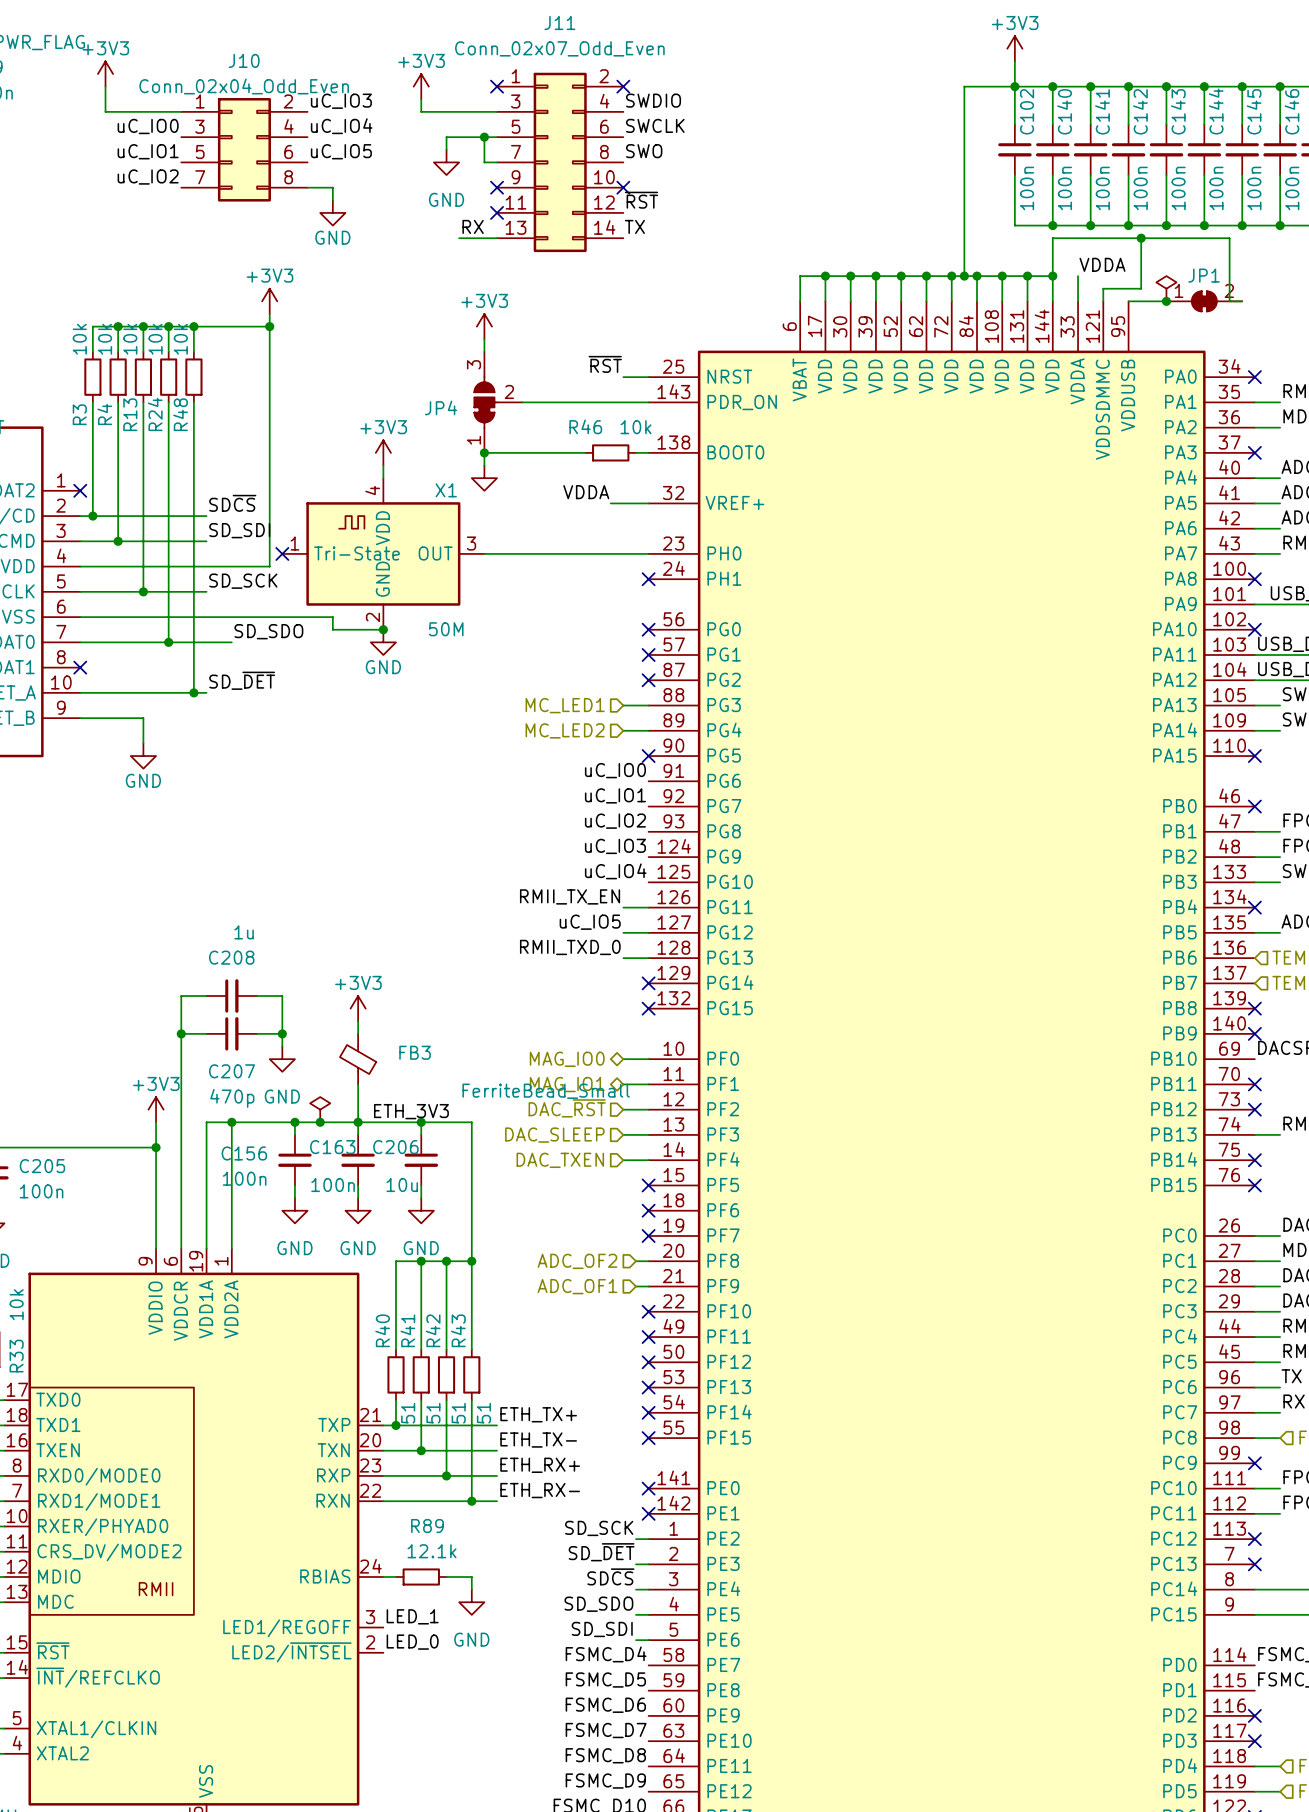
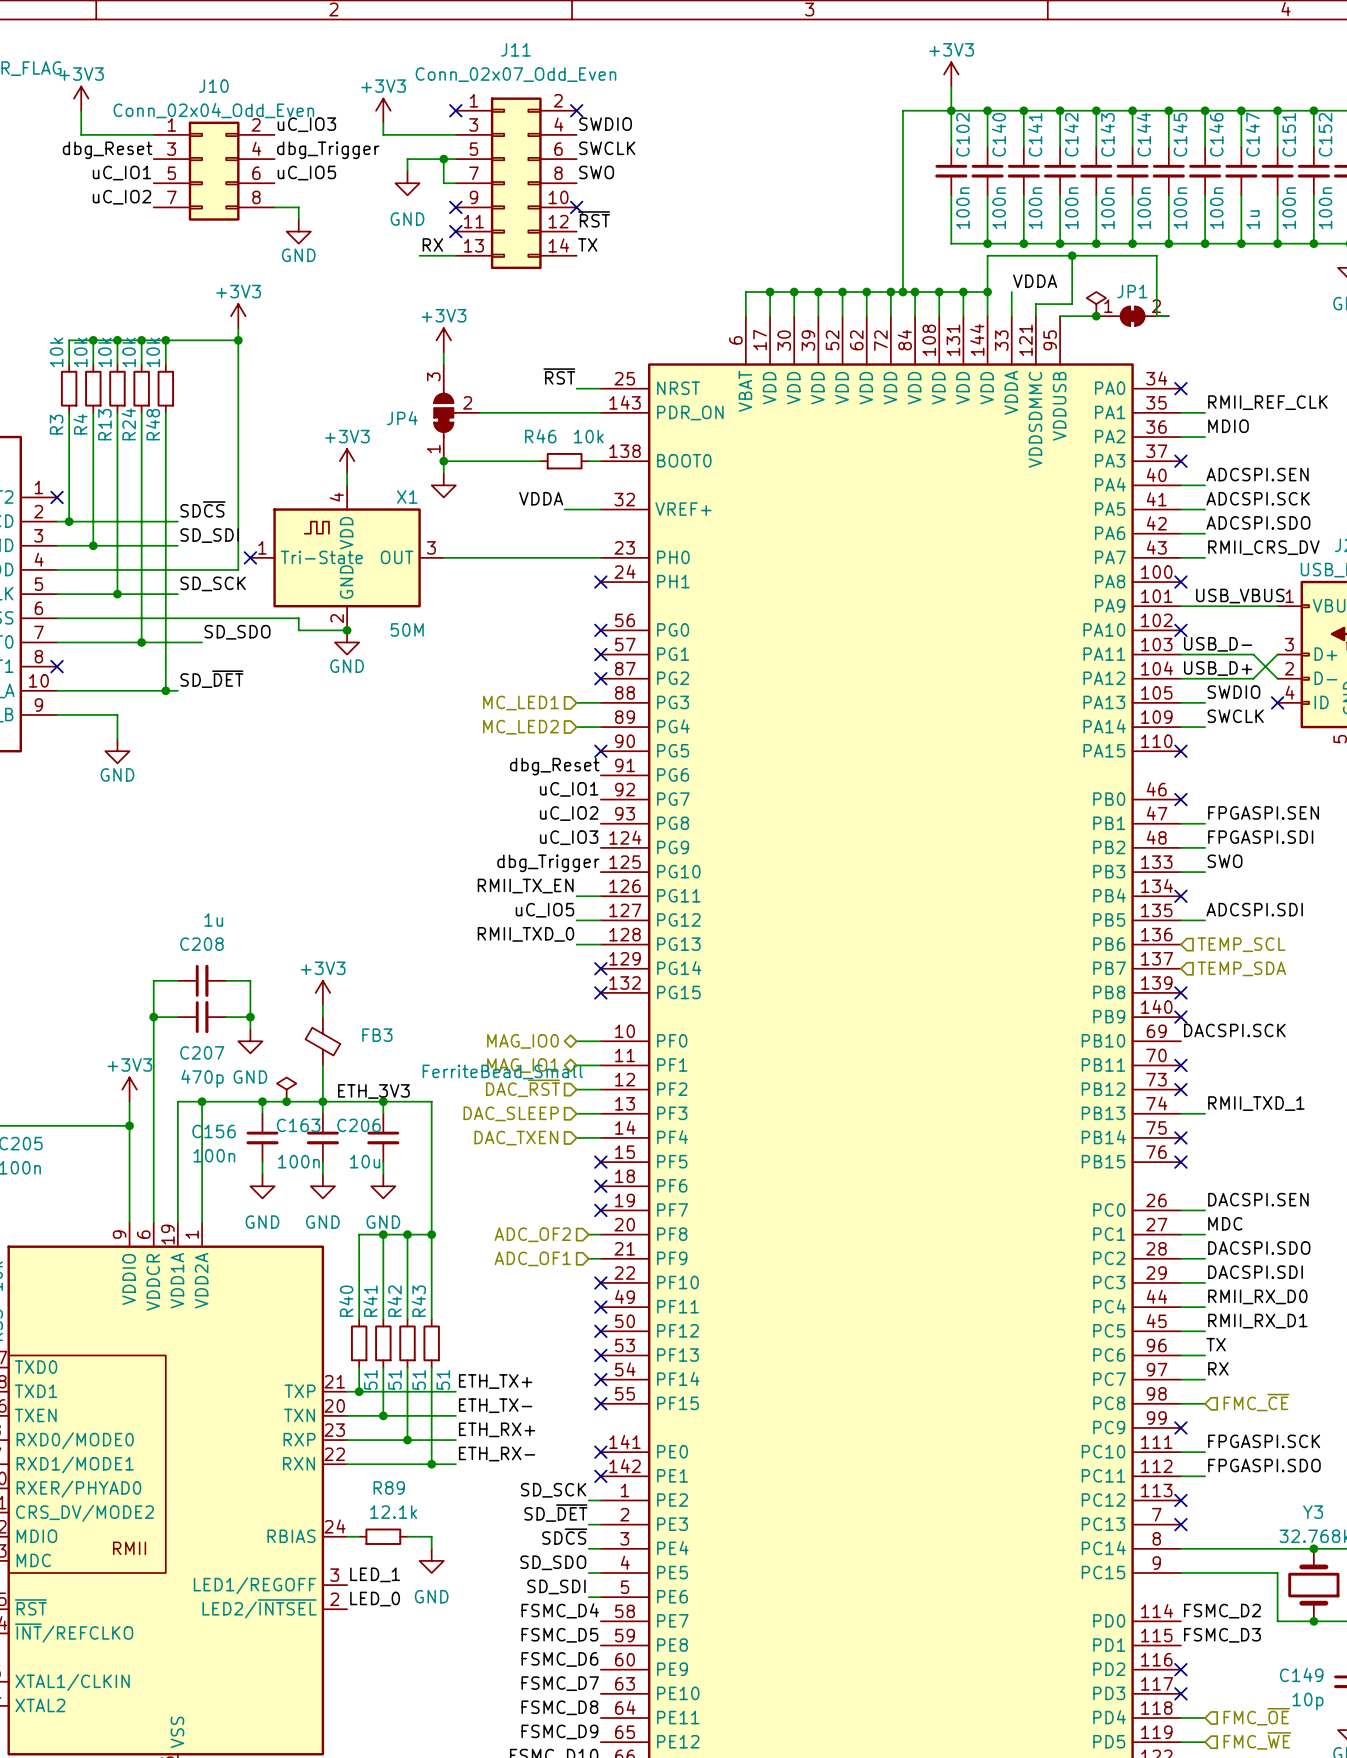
label: uC_IO0 (148, 126) -> dbg_Reset (107, 150)
label: uC_IO4 (341, 126) -> dbg_Trigger (328, 150)
label: uC_IO0 (615, 770) -> dbg_Reset (554, 766)
label: uC_IO4 (615, 871) -> dbg_Trigger (548, 863)

